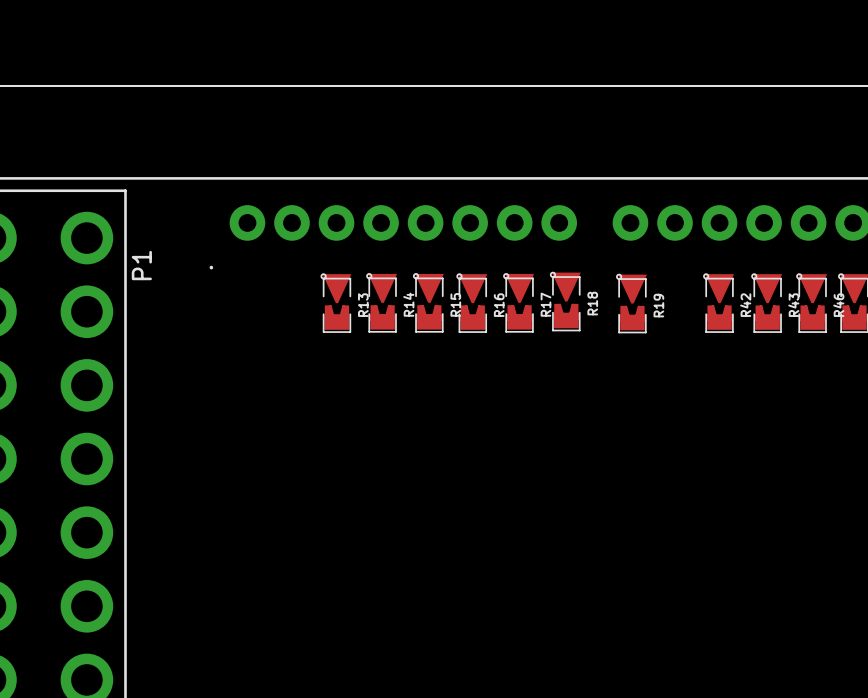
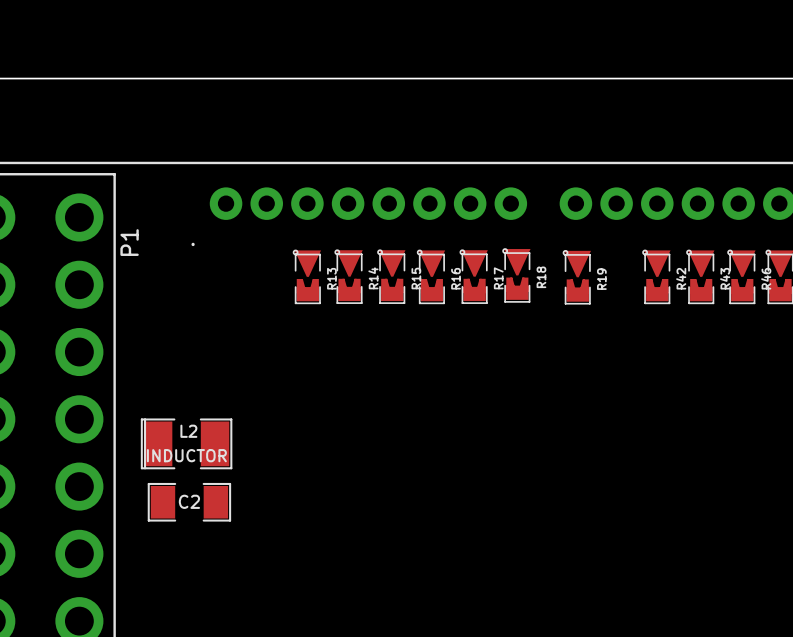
L2: none -> INDUCTOR (186, 443)
C2: none -> (189, 502)

